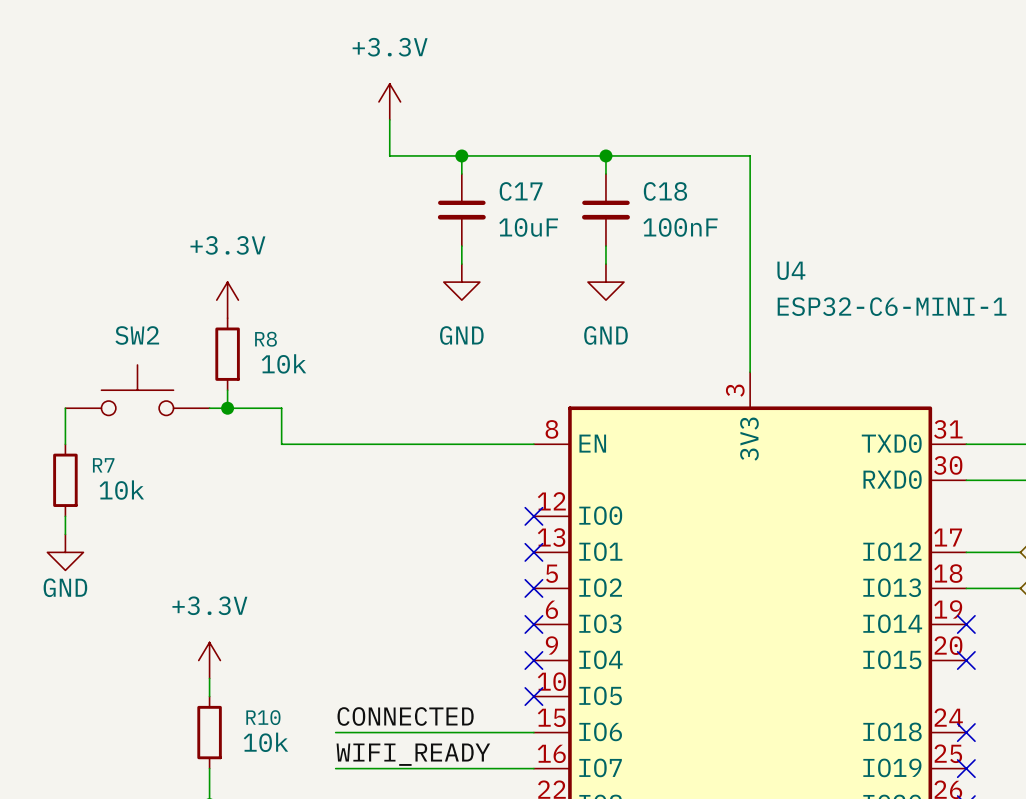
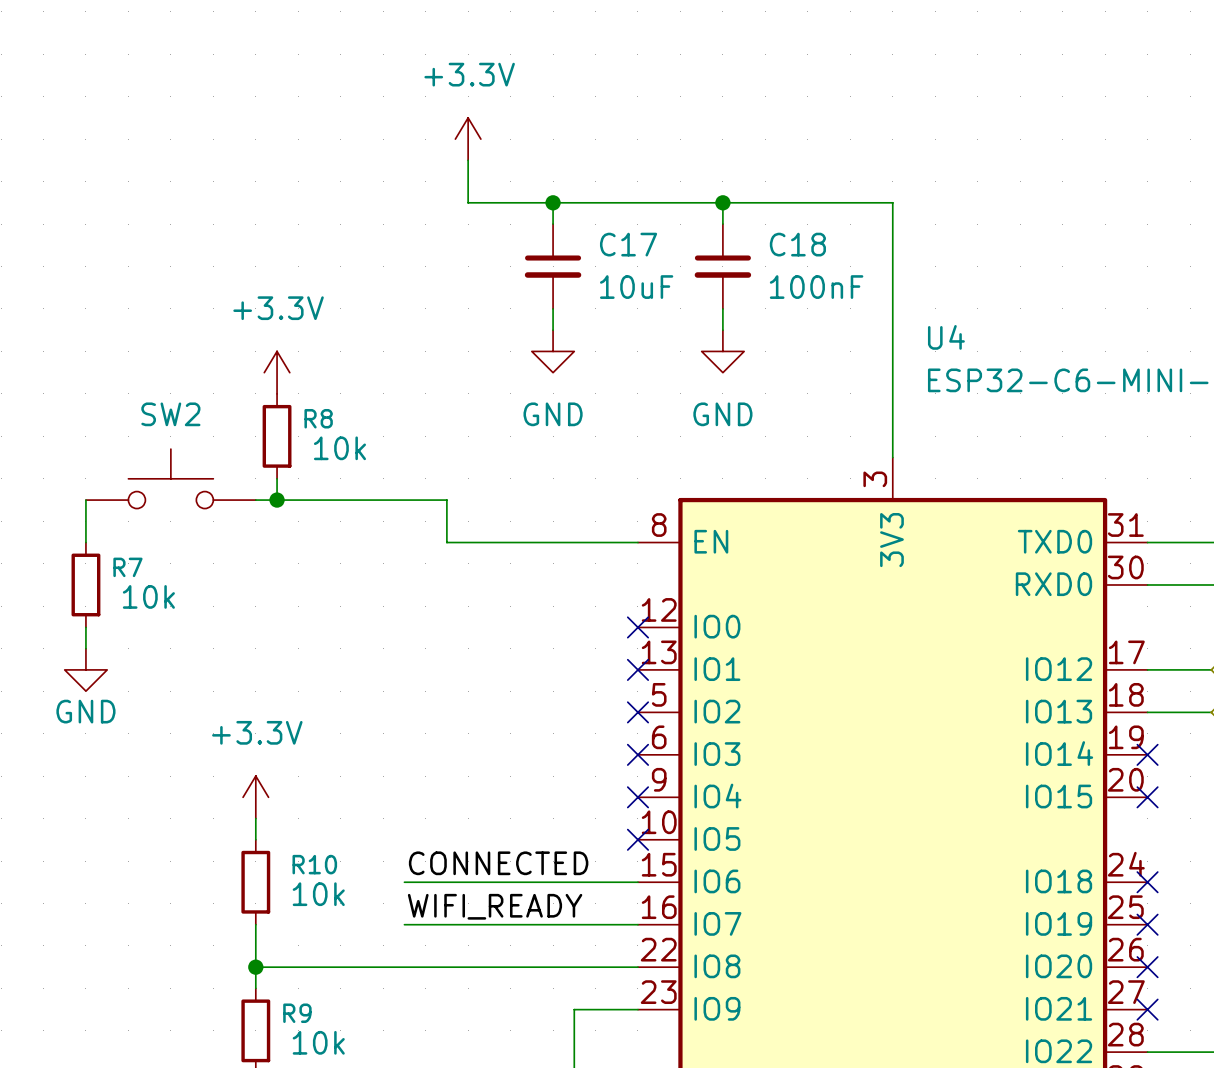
wire: (281, 408) (281, 444) (371, 444) -> (340, 500) (446, 500) (446, 542)

